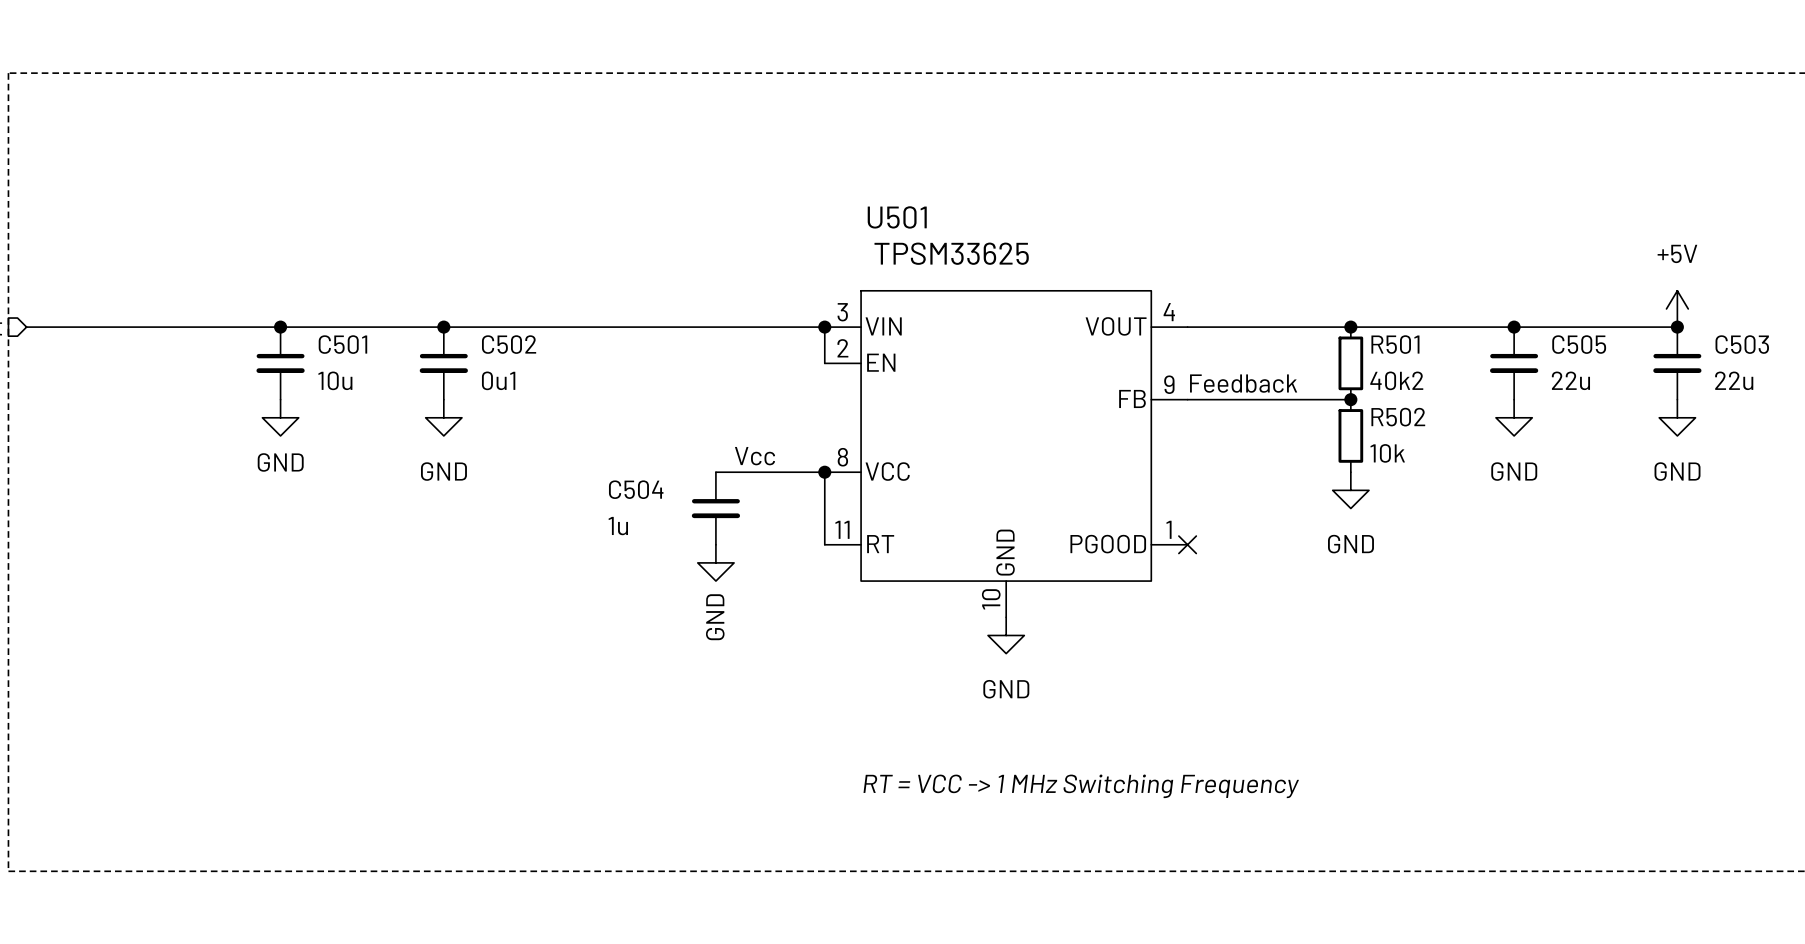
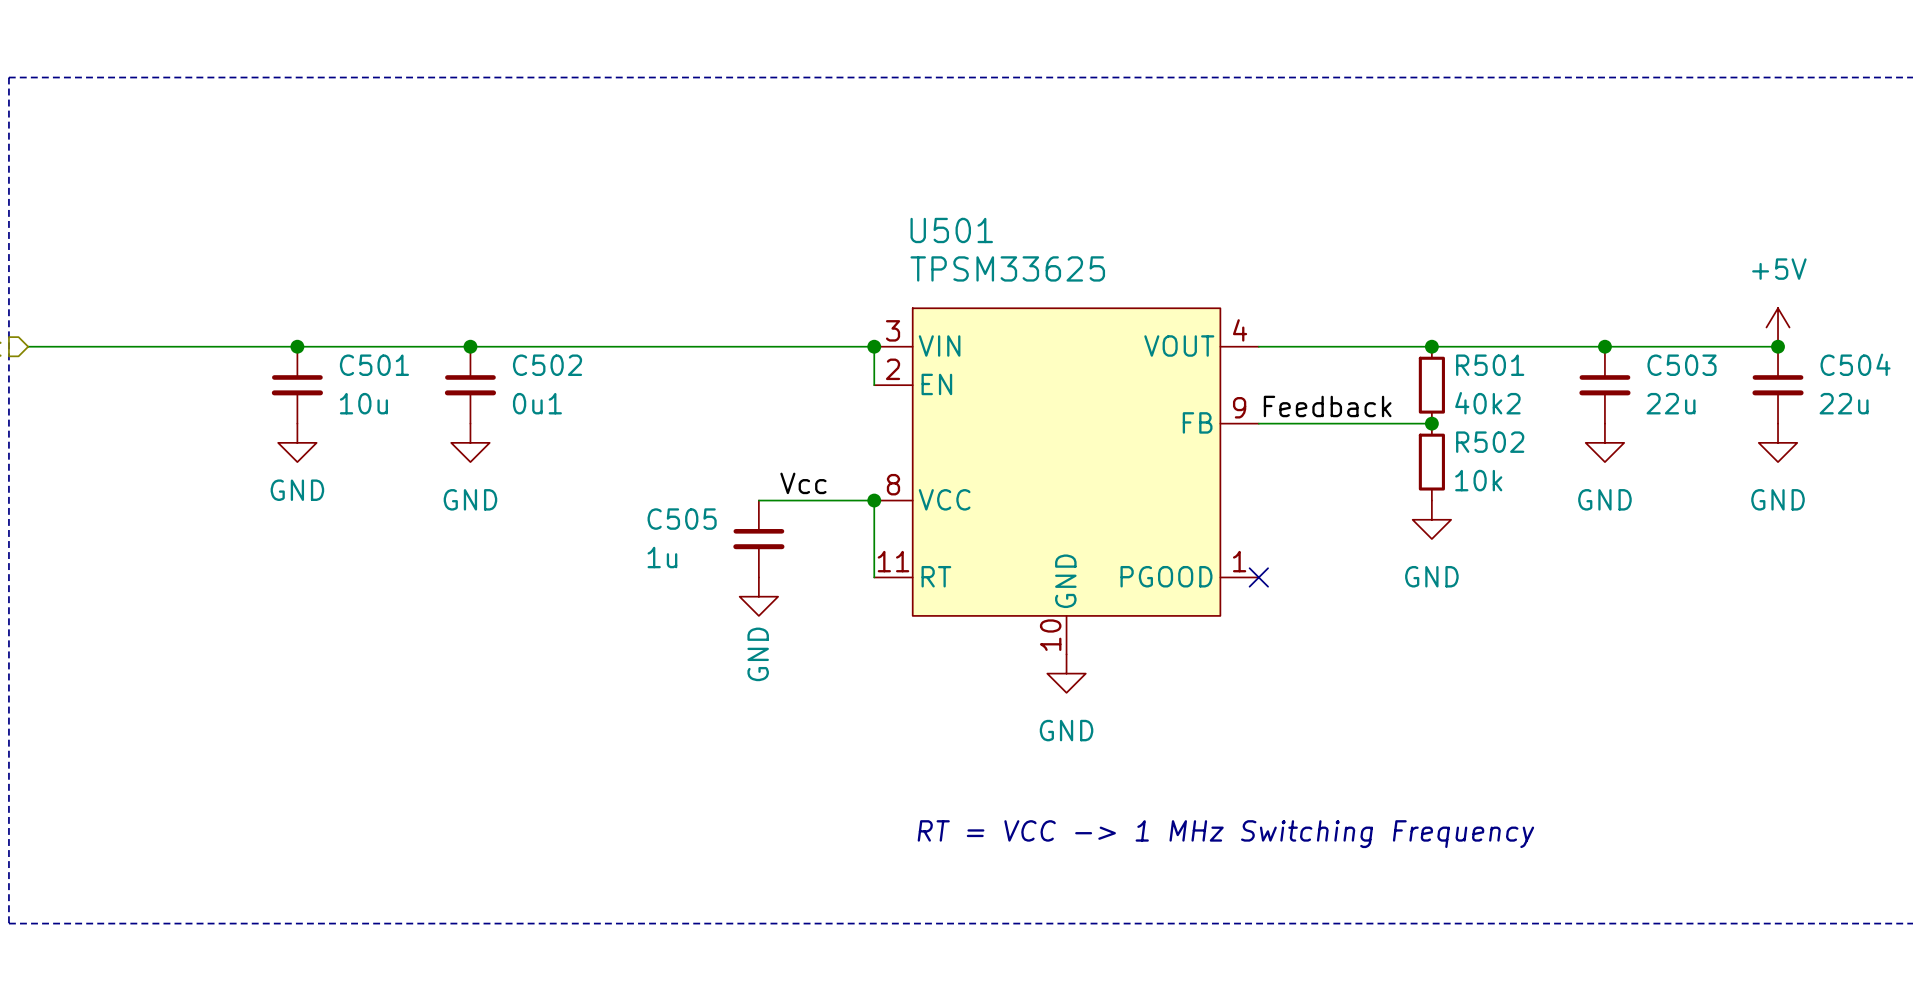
C505 name: C505 (1579, 344) -> C503 (1682, 365)
C503 name: C503 (1742, 344) -> C504 (1855, 364)
C504 name: C504 (636, 489) -> C505 (682, 519)

